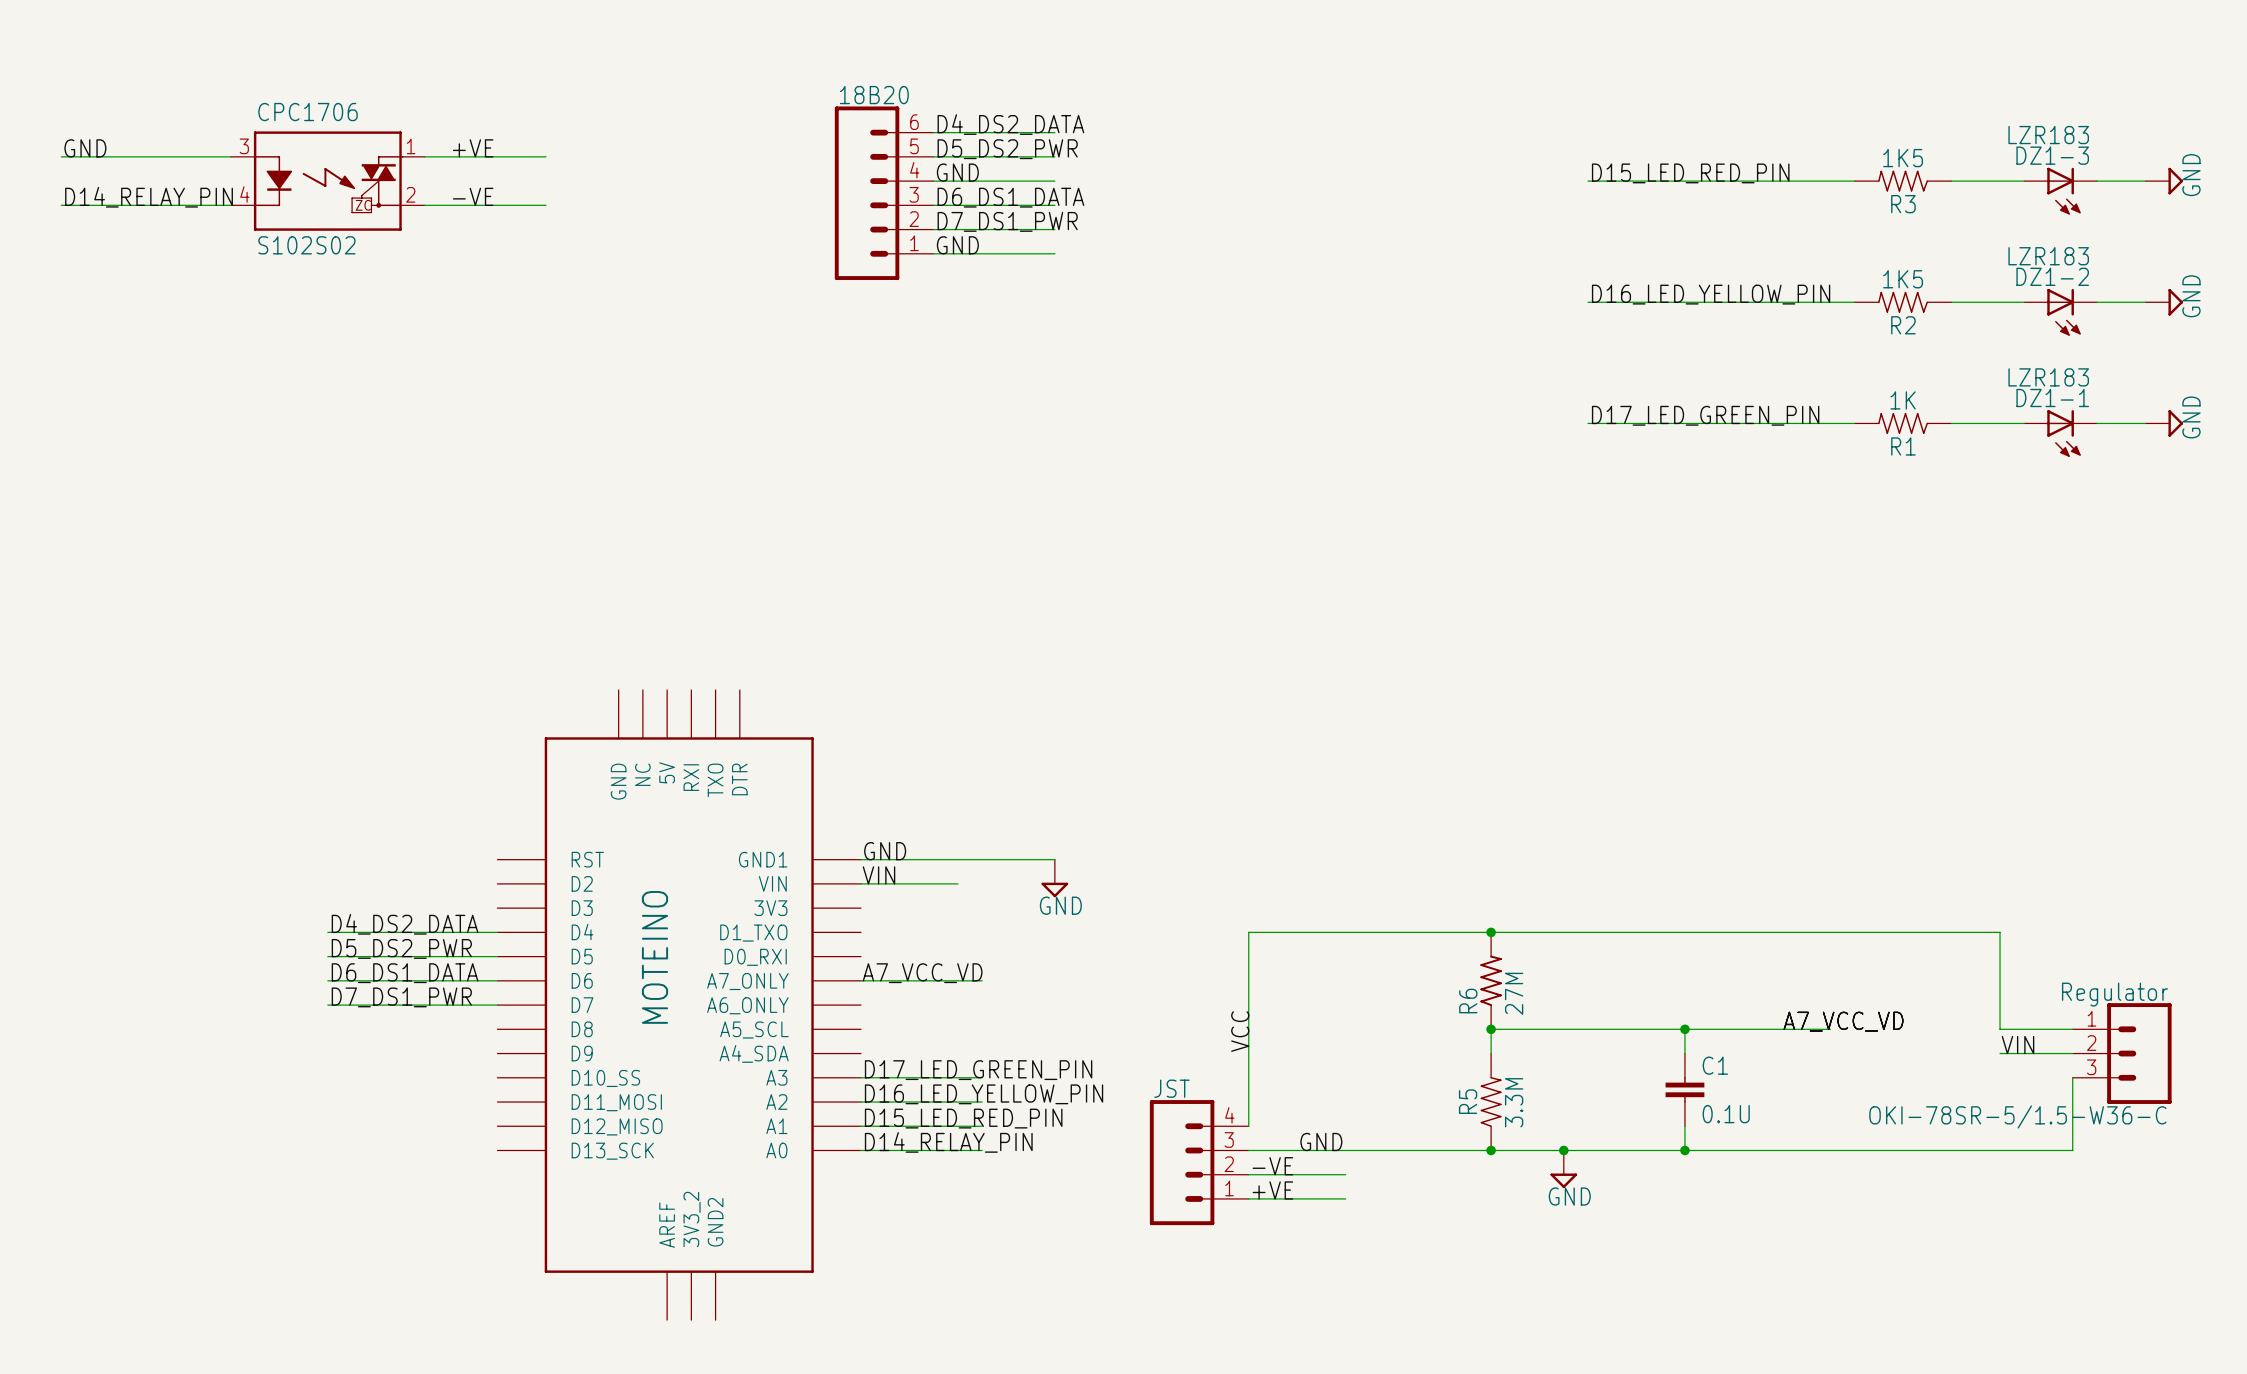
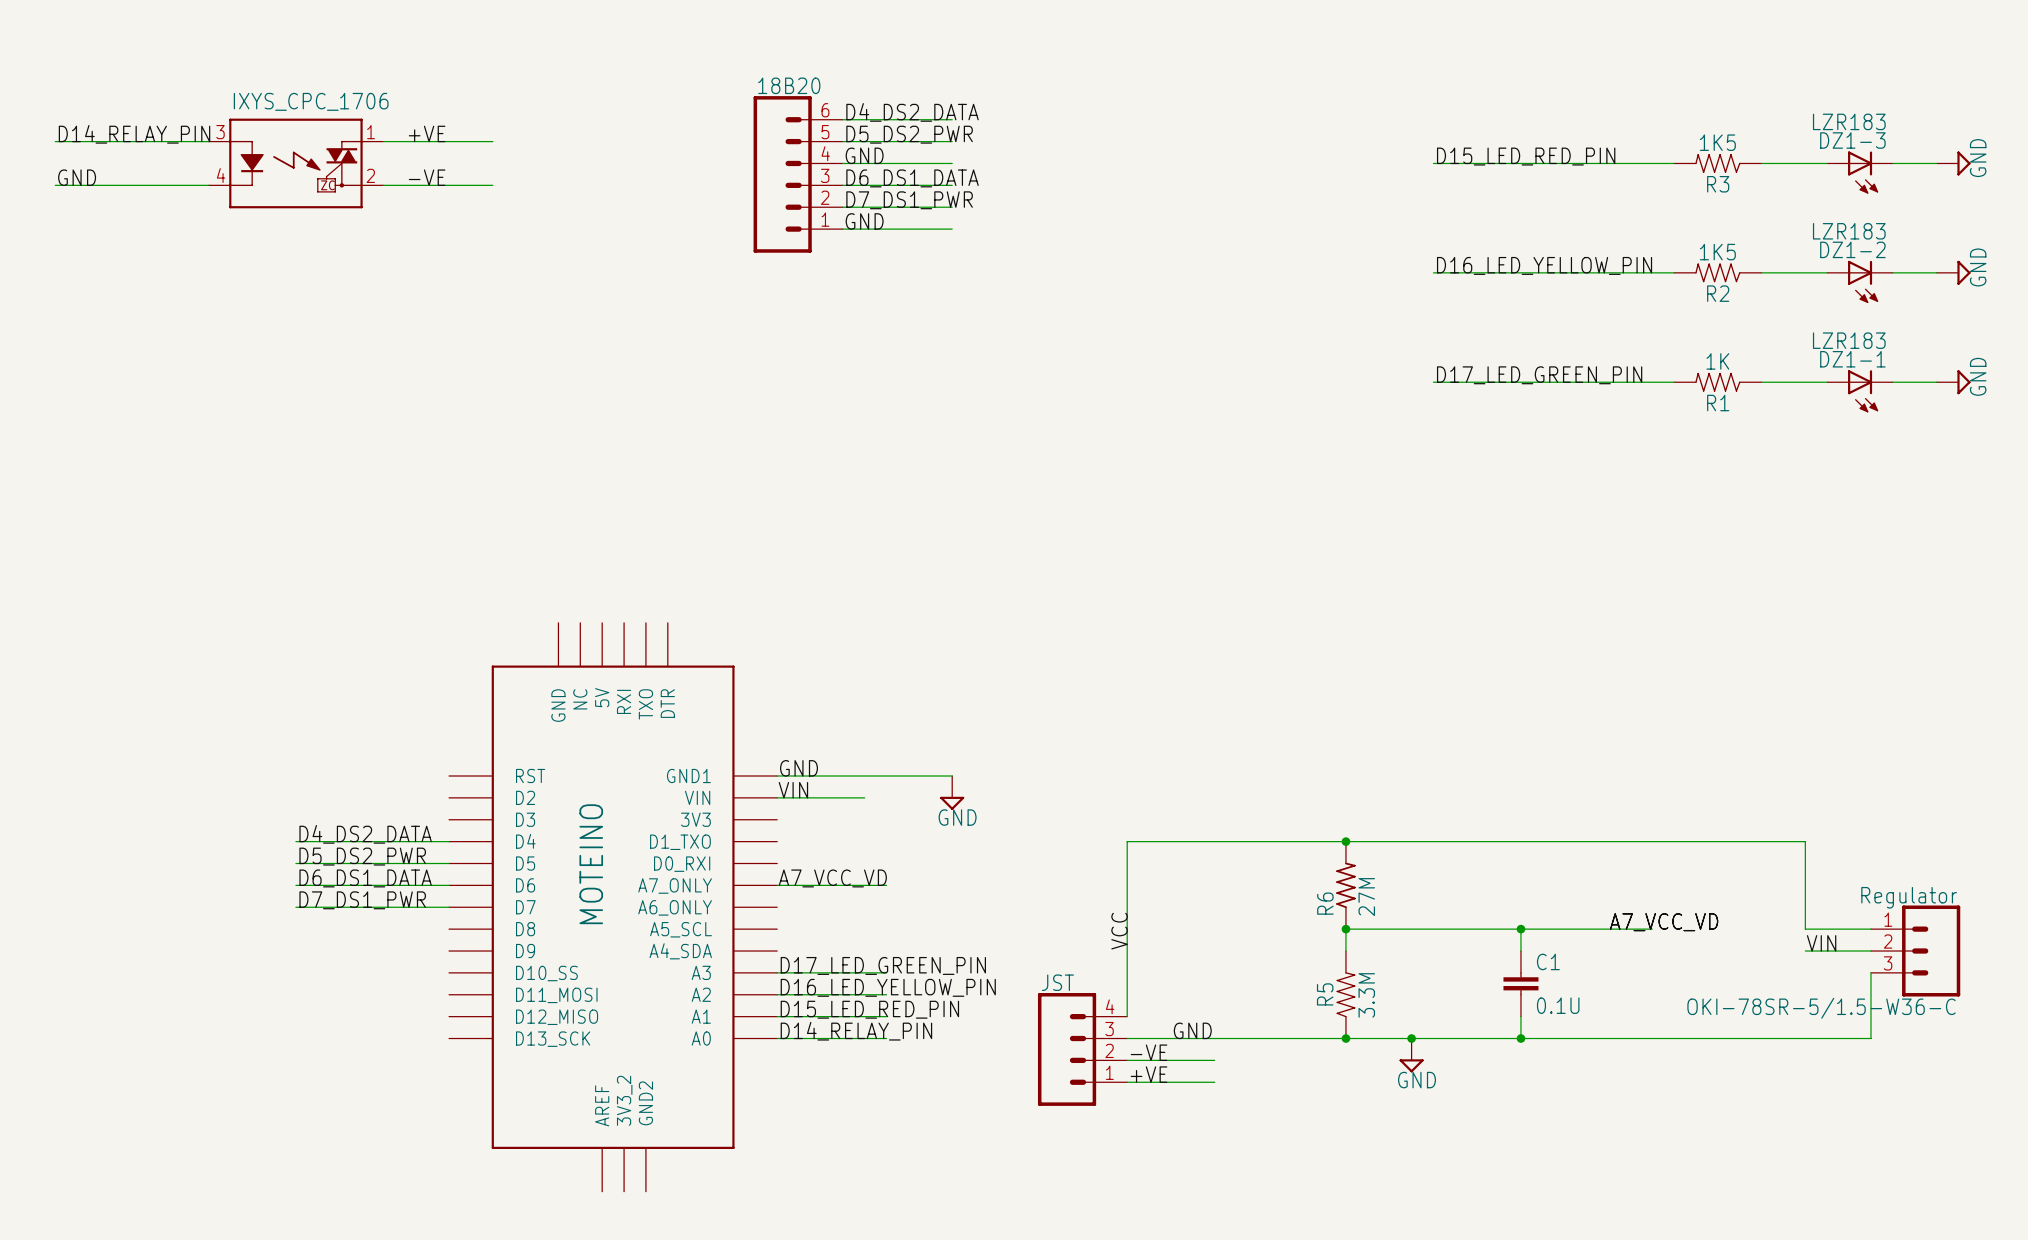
CPC1706 name: CPC1706 (308, 112) -> IXYS_CPC_1706 (311, 101)
label: GND (85, 148) -> D14_RELAY_PIN (134, 134)
label: D14_RELAY_PIN (149, 197) -> GND (77, 177)
CPC1706 value: S102S02 (306, 245) -> none

